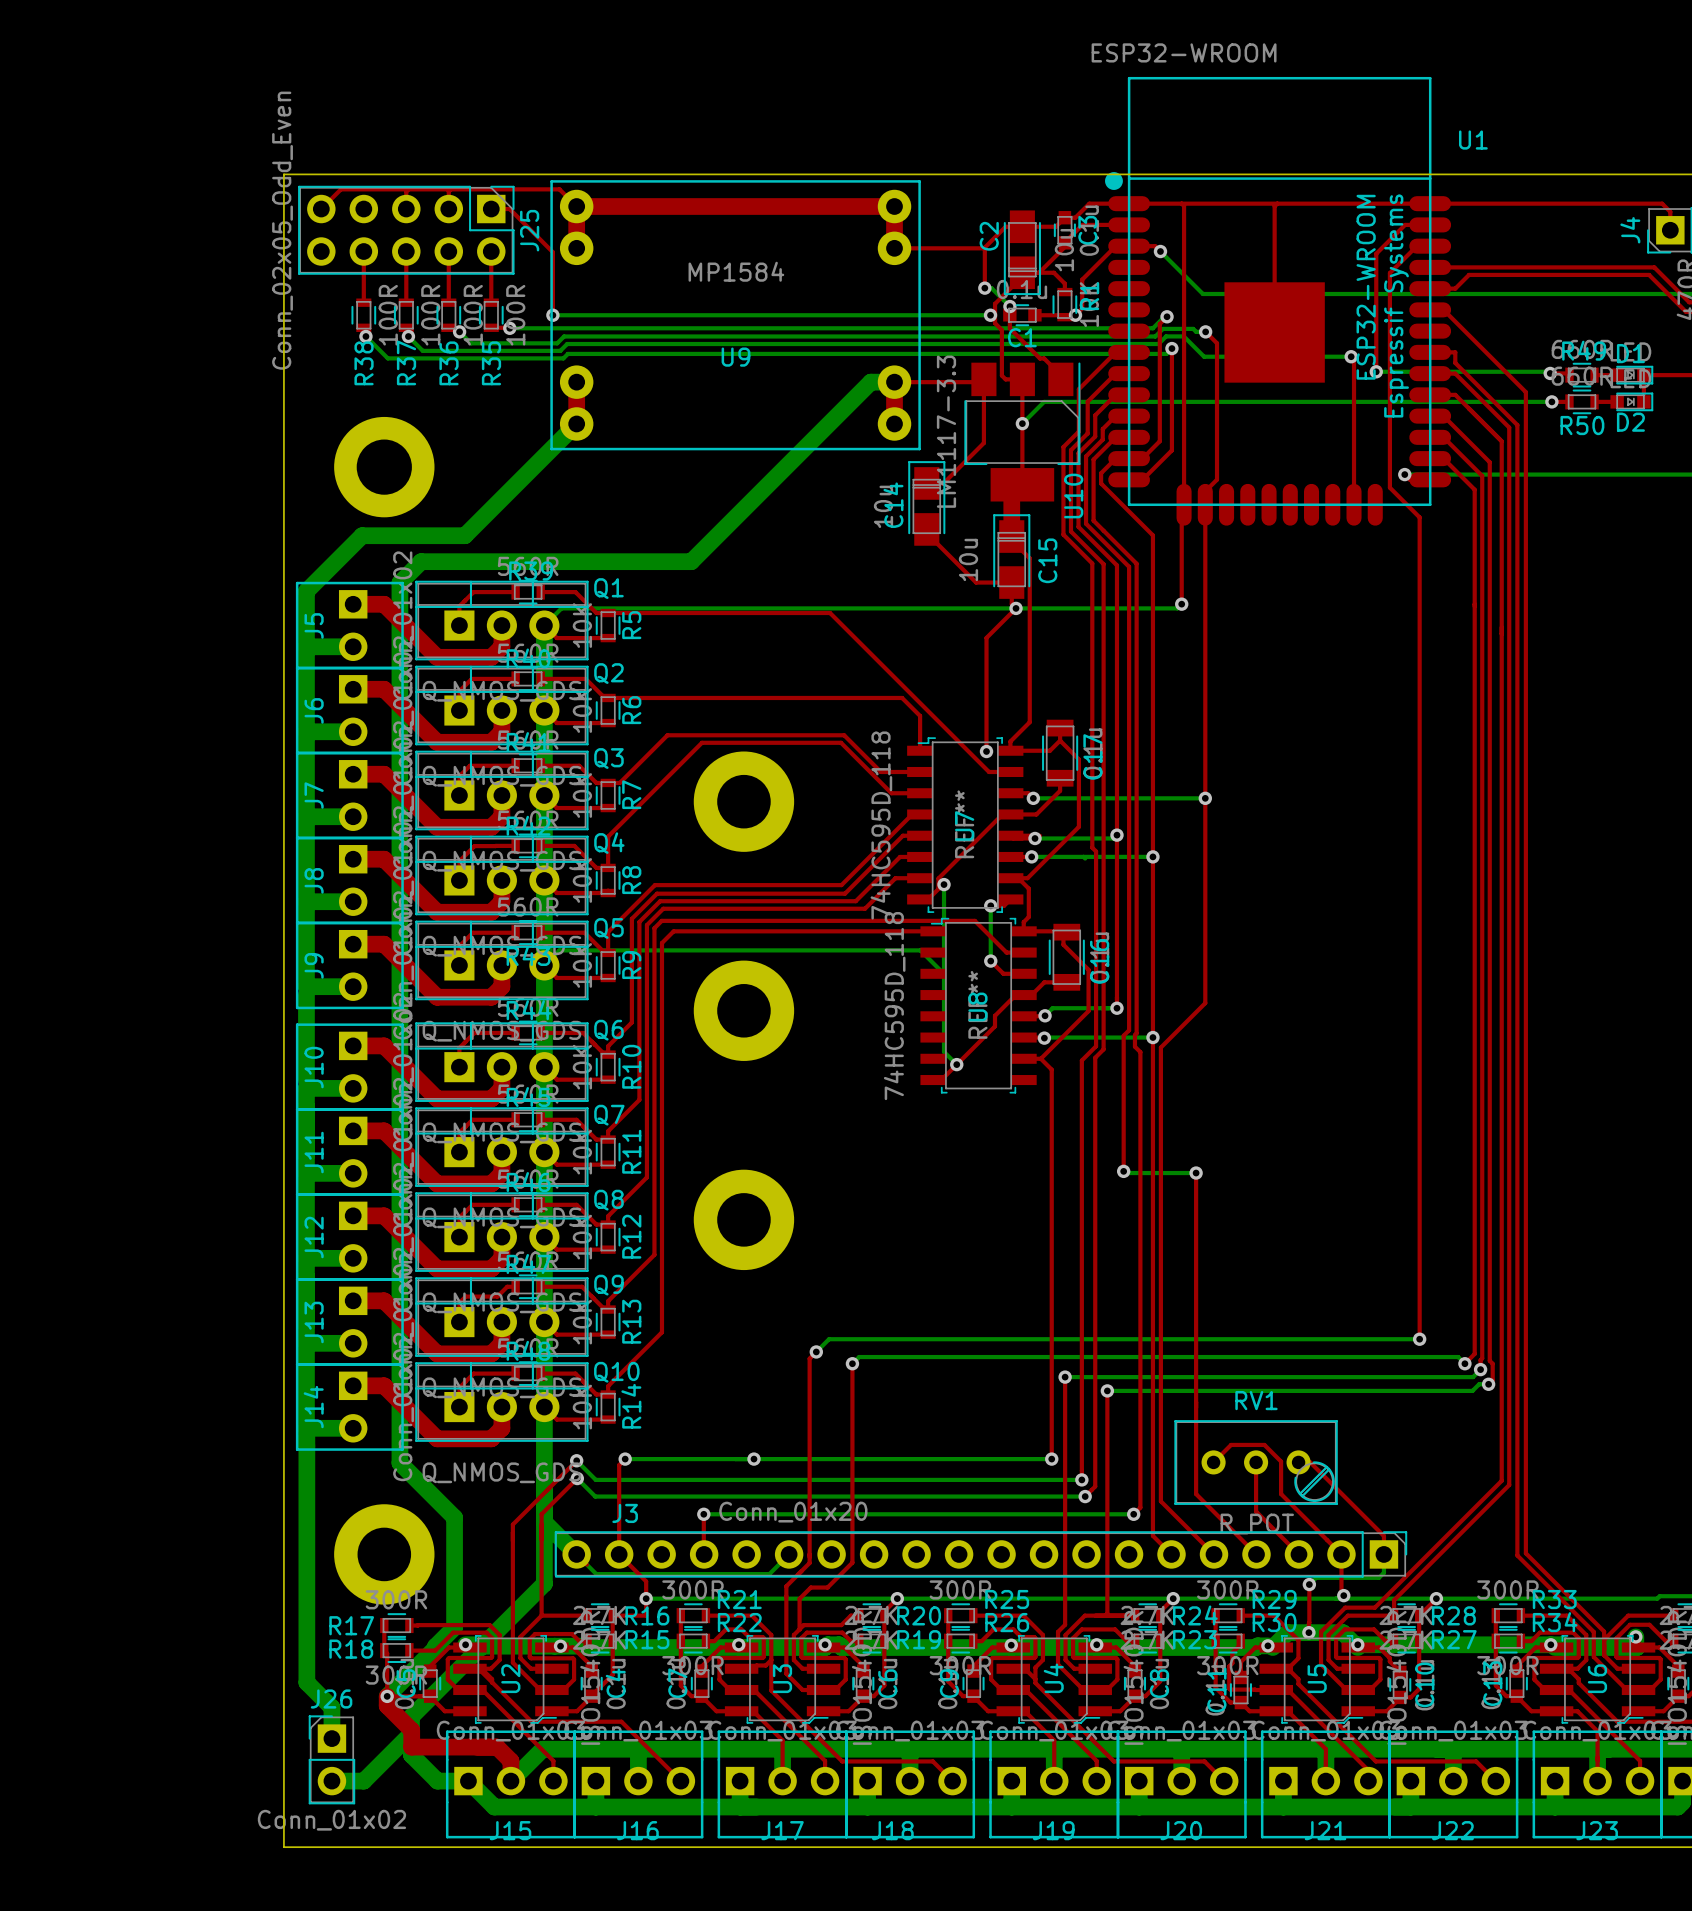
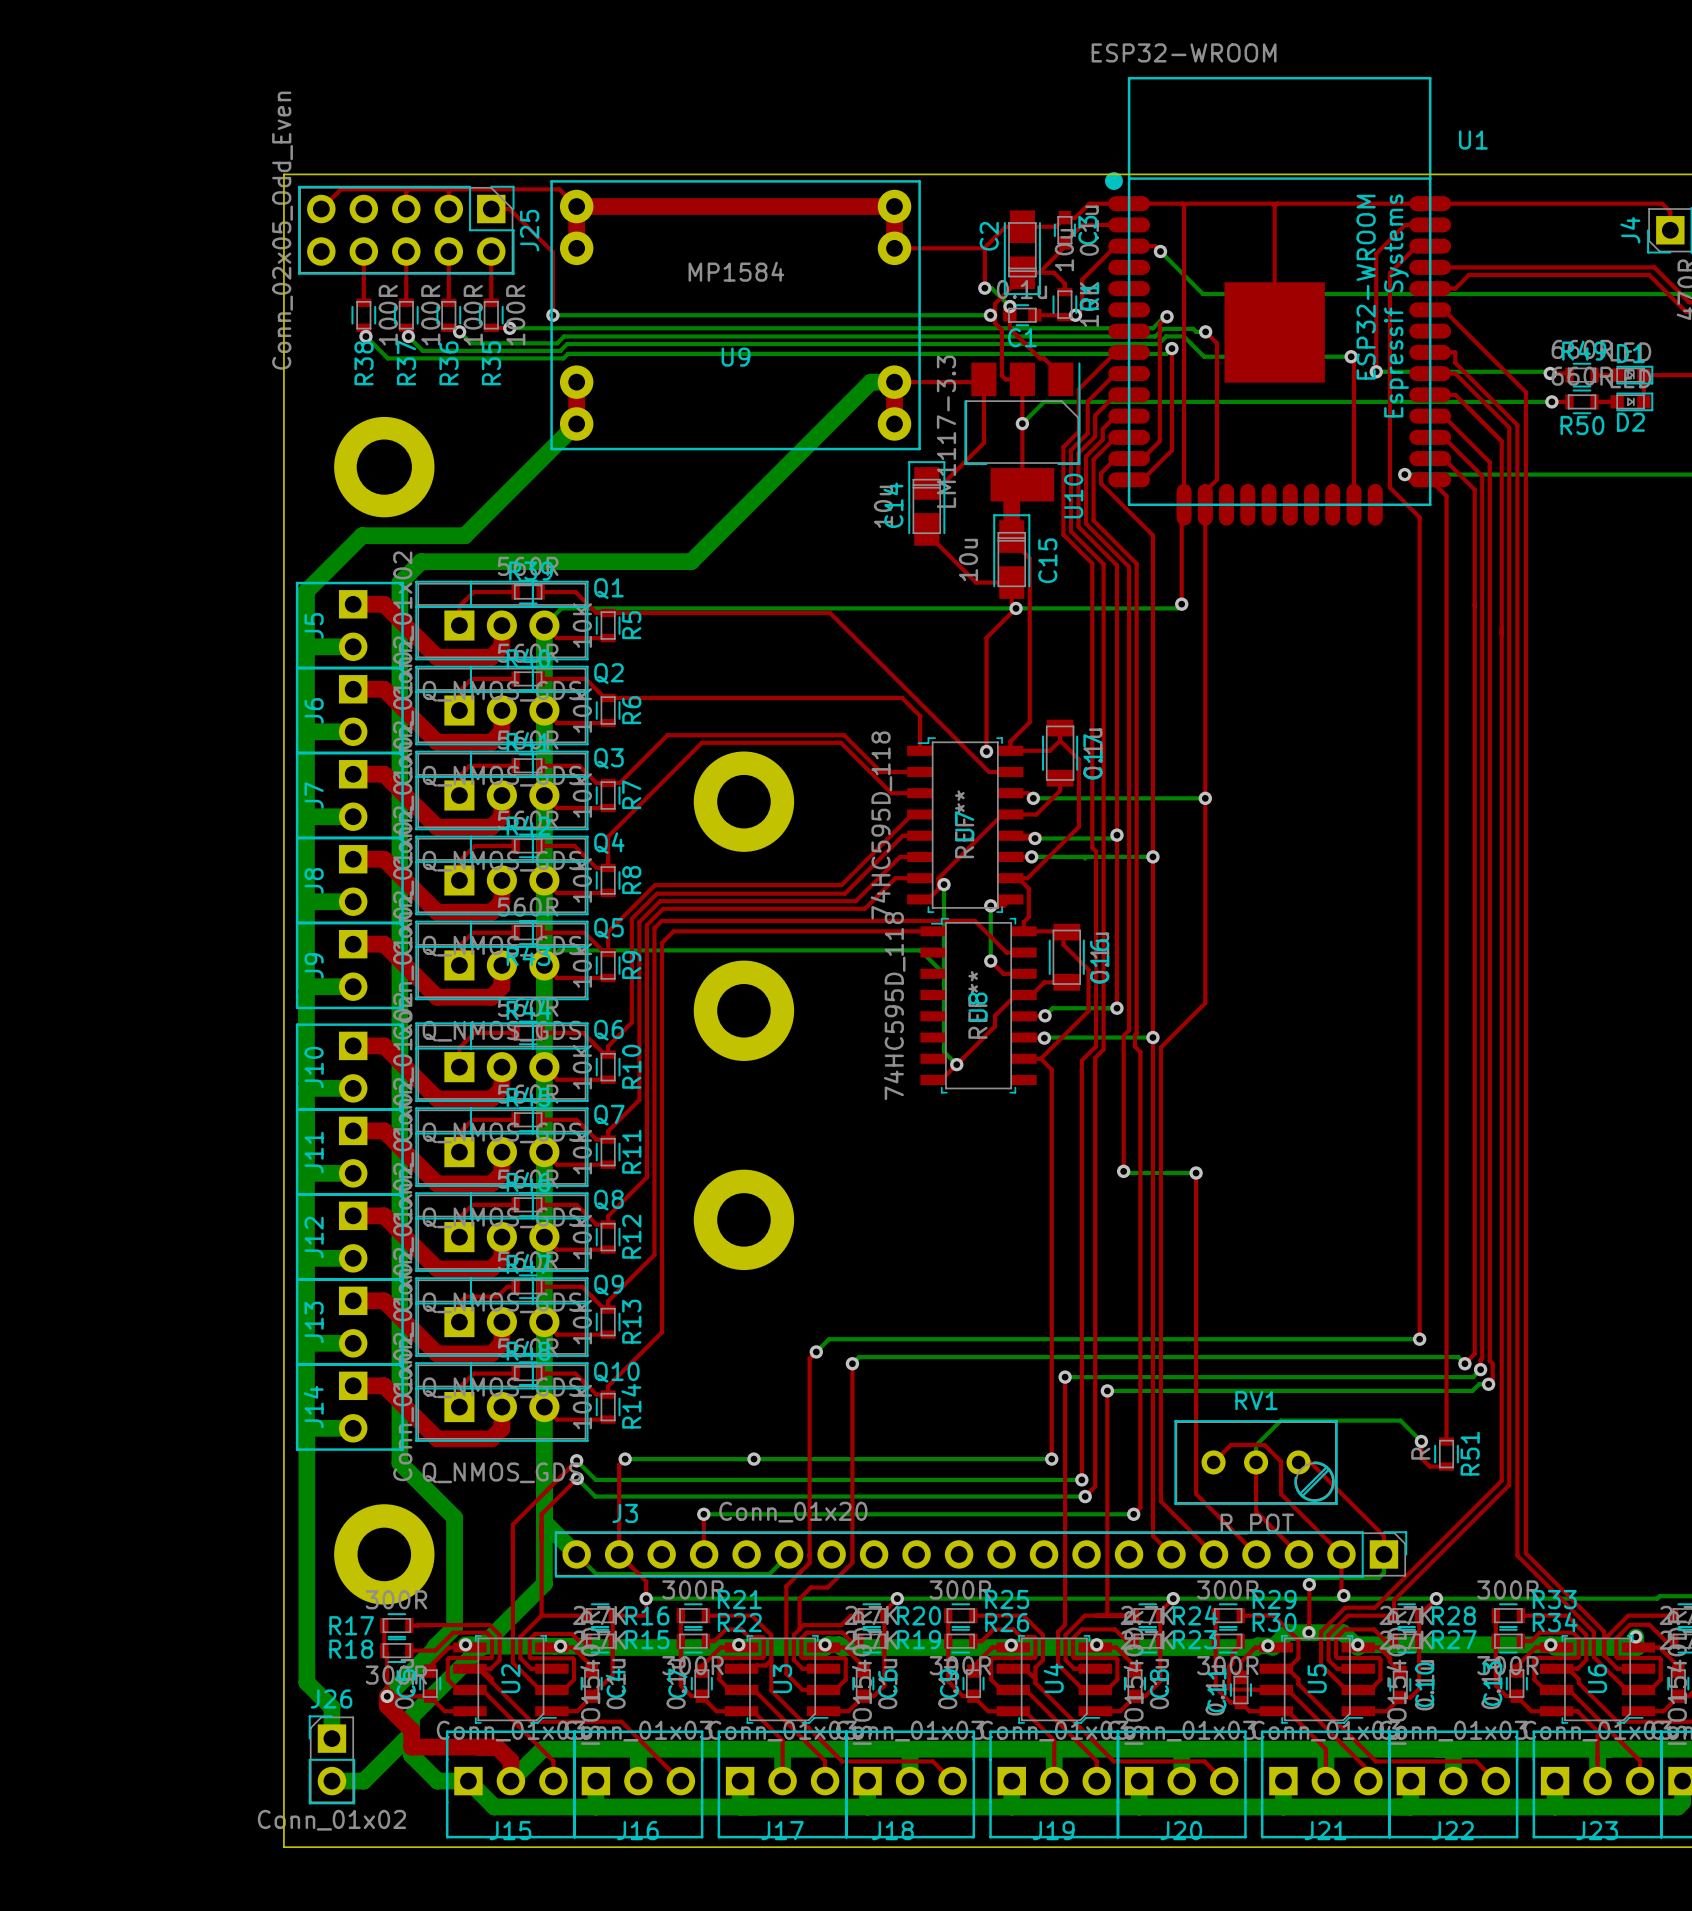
top track: none -> (1430, 479) (1446, 496) (1446, 1441)
top track: none -> (1421, 1441) (1421, 1458) (1429, 1466) (1446, 1466)
bottom track: none -> (1421, 1441) (1400, 1420) (1280, 1420) (1256, 1445) (1256, 1462)
via: none -> (1421, 1441)
R51: none -> R (1446, 1454)

